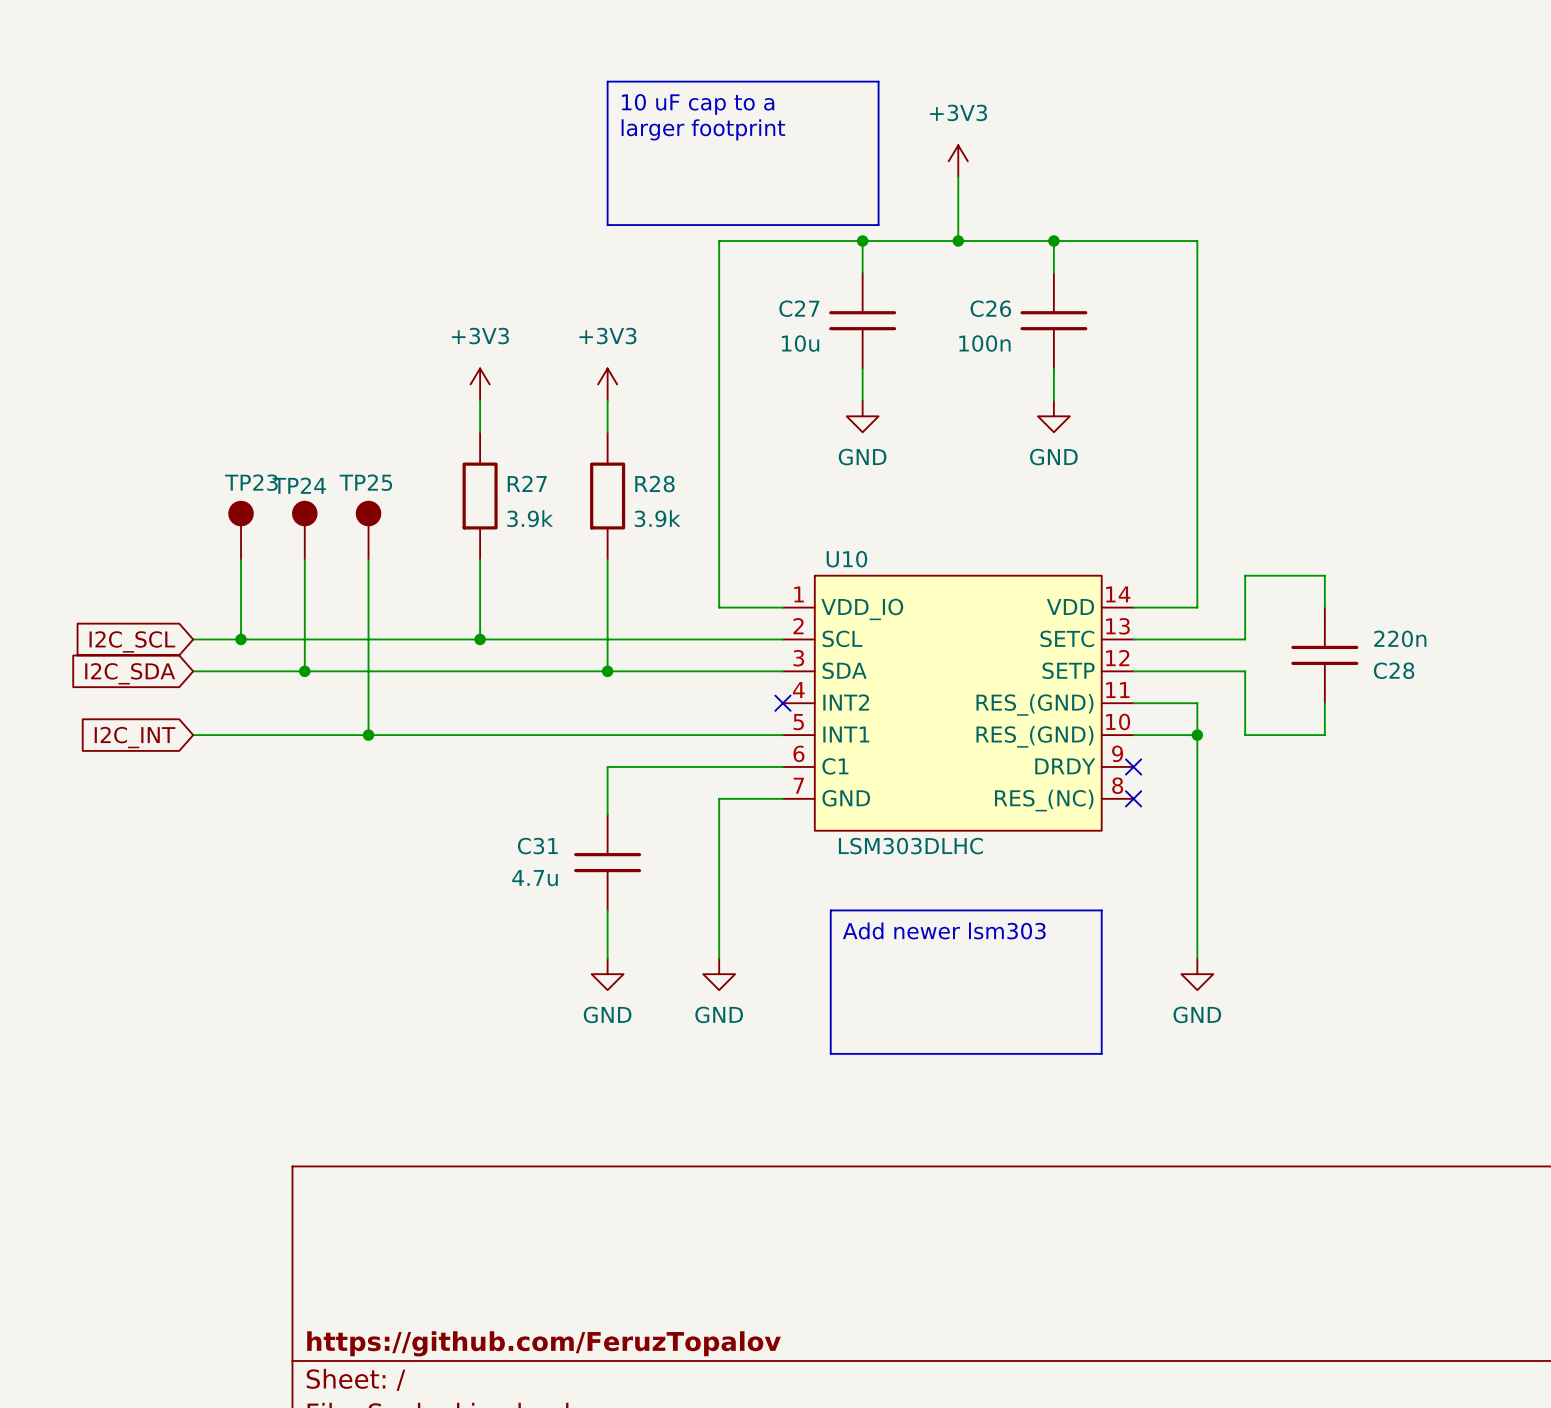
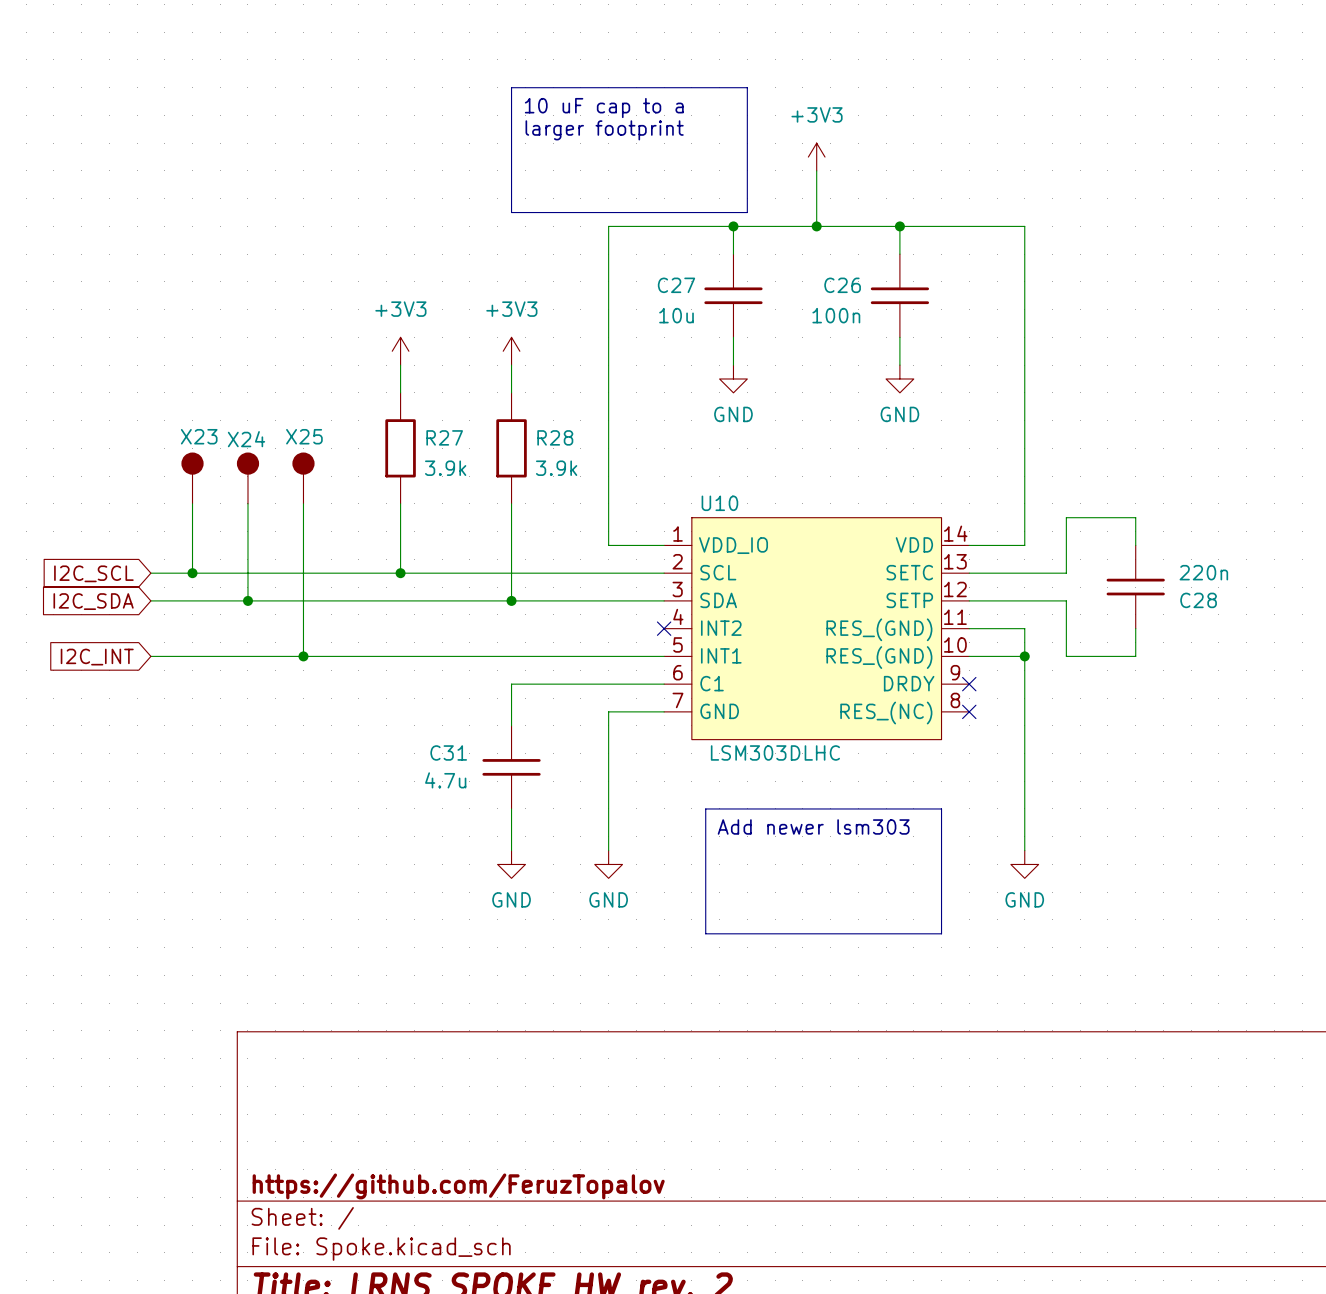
TP23 name: TP23 (251, 482) -> X23 (199, 436)
TP25 name: TP25 (365, 482) -> X25 (304, 436)
TP24 name: TP24 (299, 485) -> X24 (246, 439)

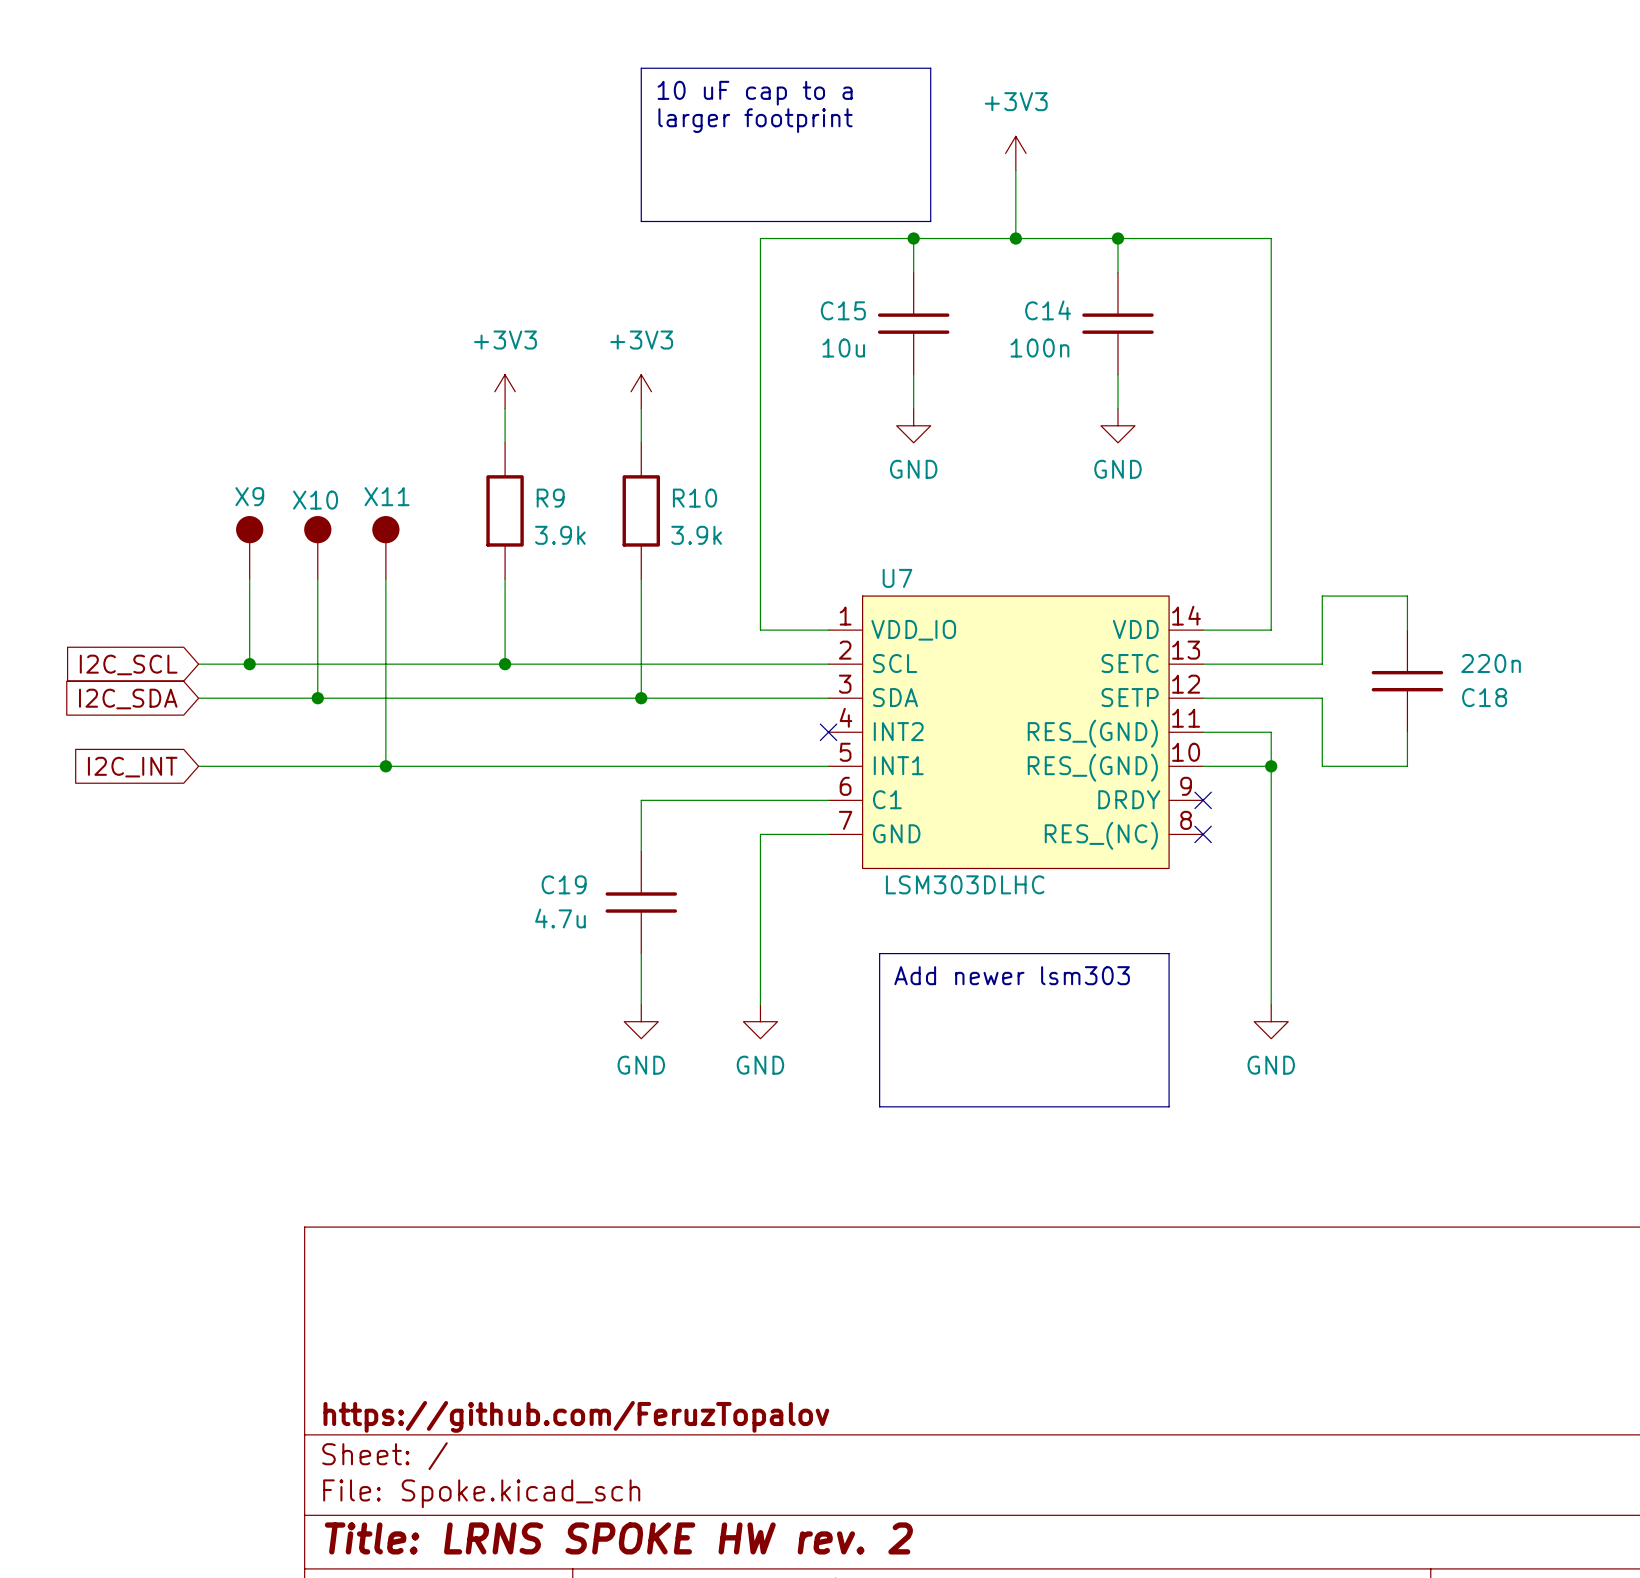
C27 name: C27 (676, 285) -> C15 (843, 310)
C26 name: C26 (842, 285) -> C14 (1048, 310)
X23 name: X23 (199, 436) -> X9 (249, 496)
X25 name: X25 (304, 436) -> X11 (387, 496)
R27 name: R27 (444, 437) -> R9 (550, 498)
R28 name: R28 (555, 437) -> R10 (694, 498)
X24 name: X24 (246, 439) -> X10 (315, 500)
U10 name: U10 (719, 503) -> U7 (897, 578)
C28 name: C28 (1198, 600) -> C18 (1484, 697)
C31 name: C31 (448, 752) -> C19 (564, 884)

